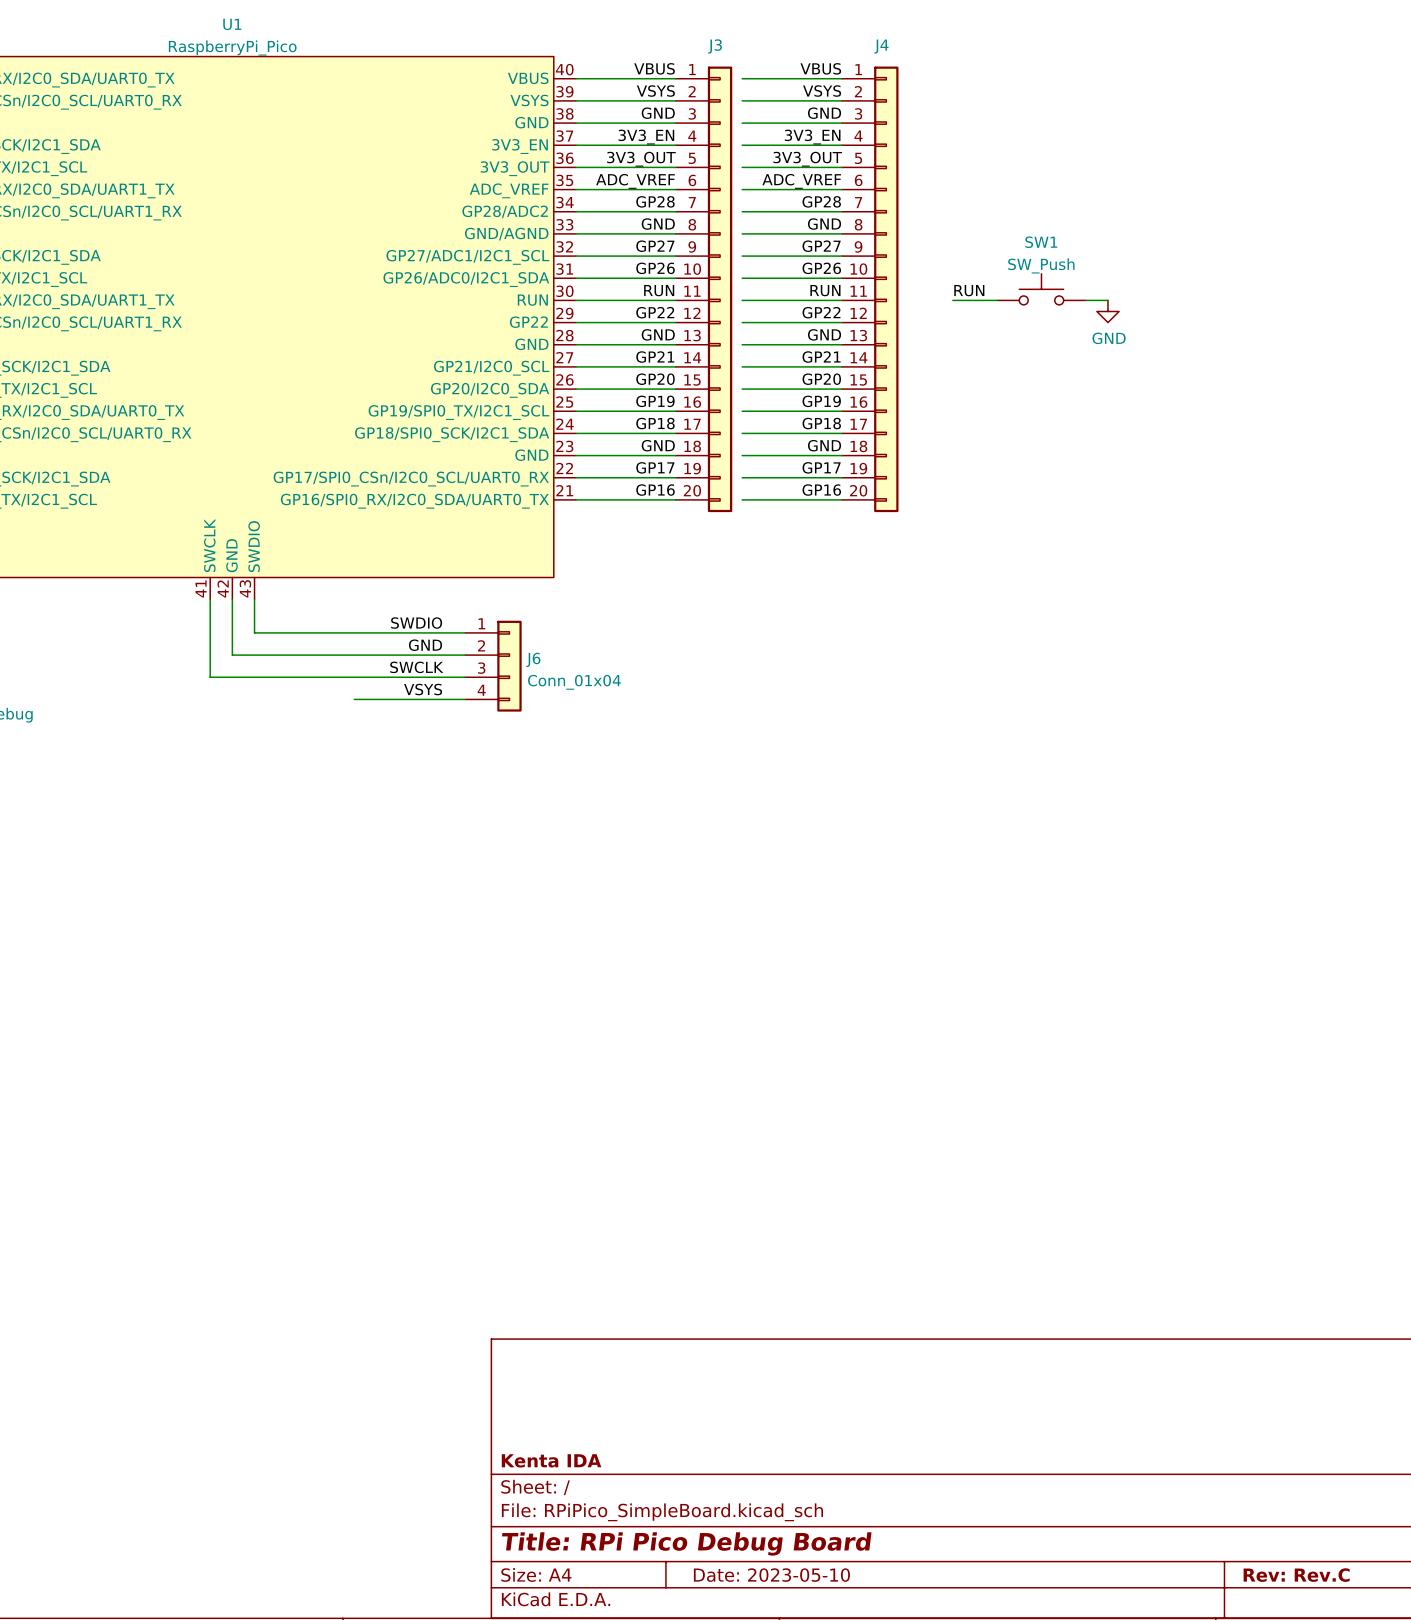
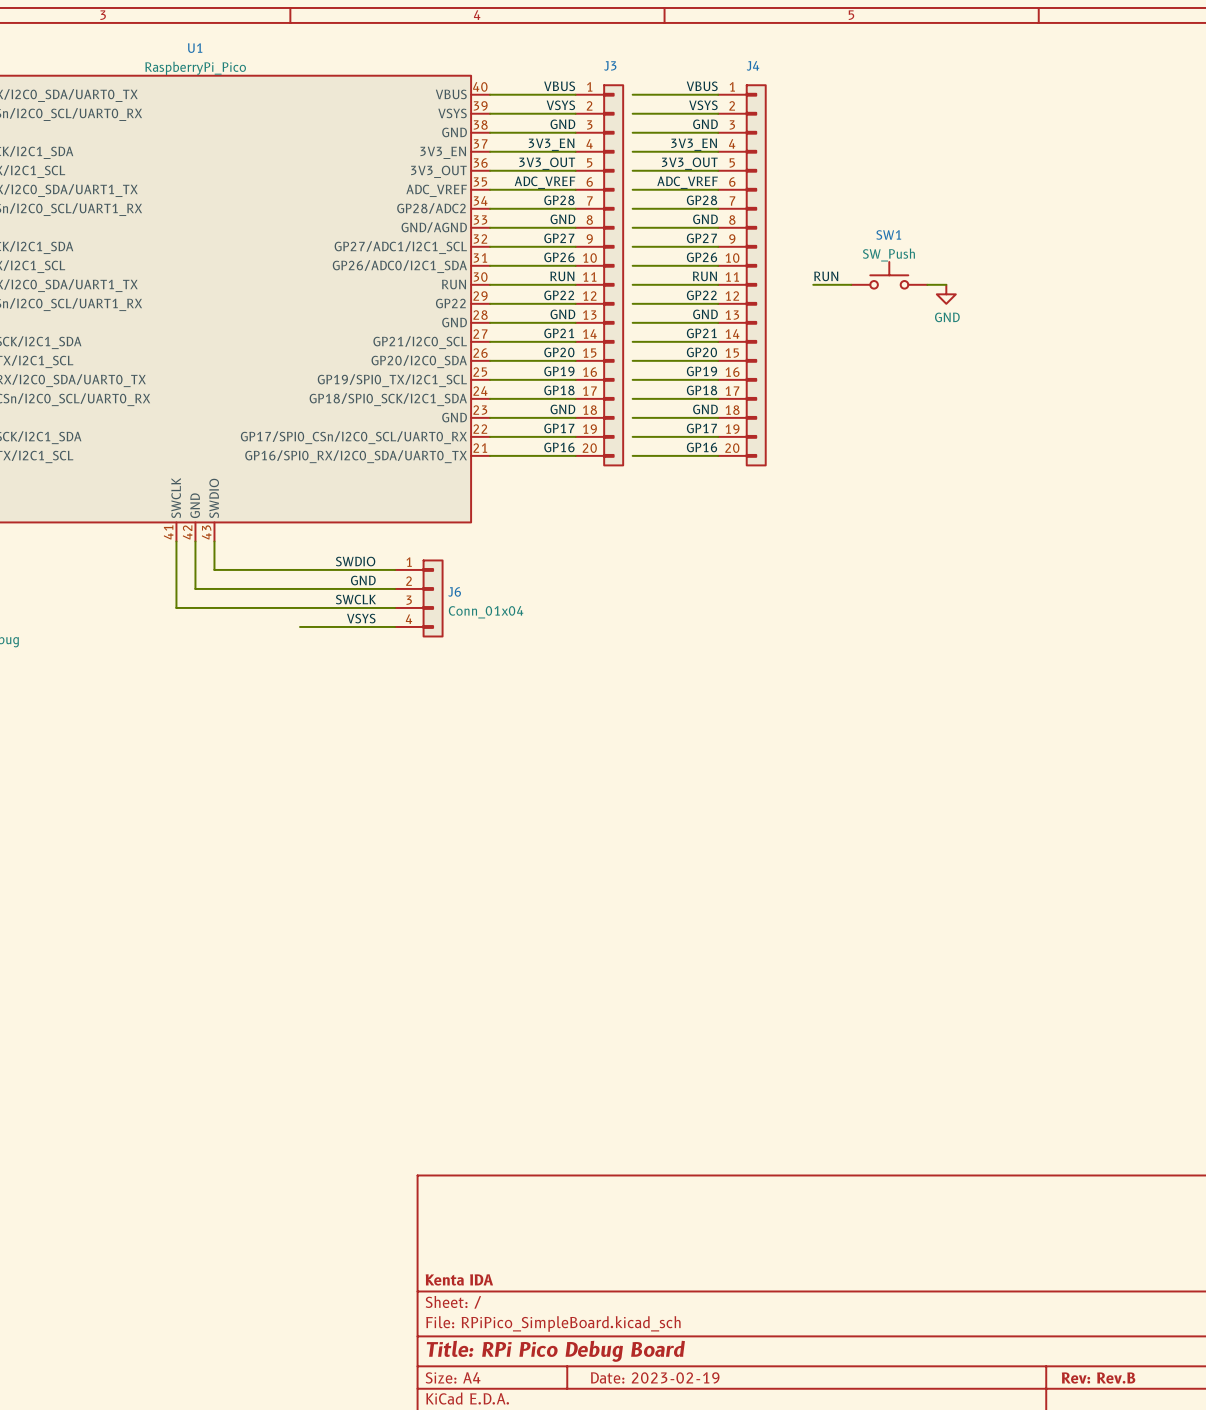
title block: Date: 2023-05-10 (771, 1575) -> Date: 2023-02-19 (655, 1377)
title block: Rev: Rev.C (1296, 1575) -> Rev: Rev.B (1098, 1378)

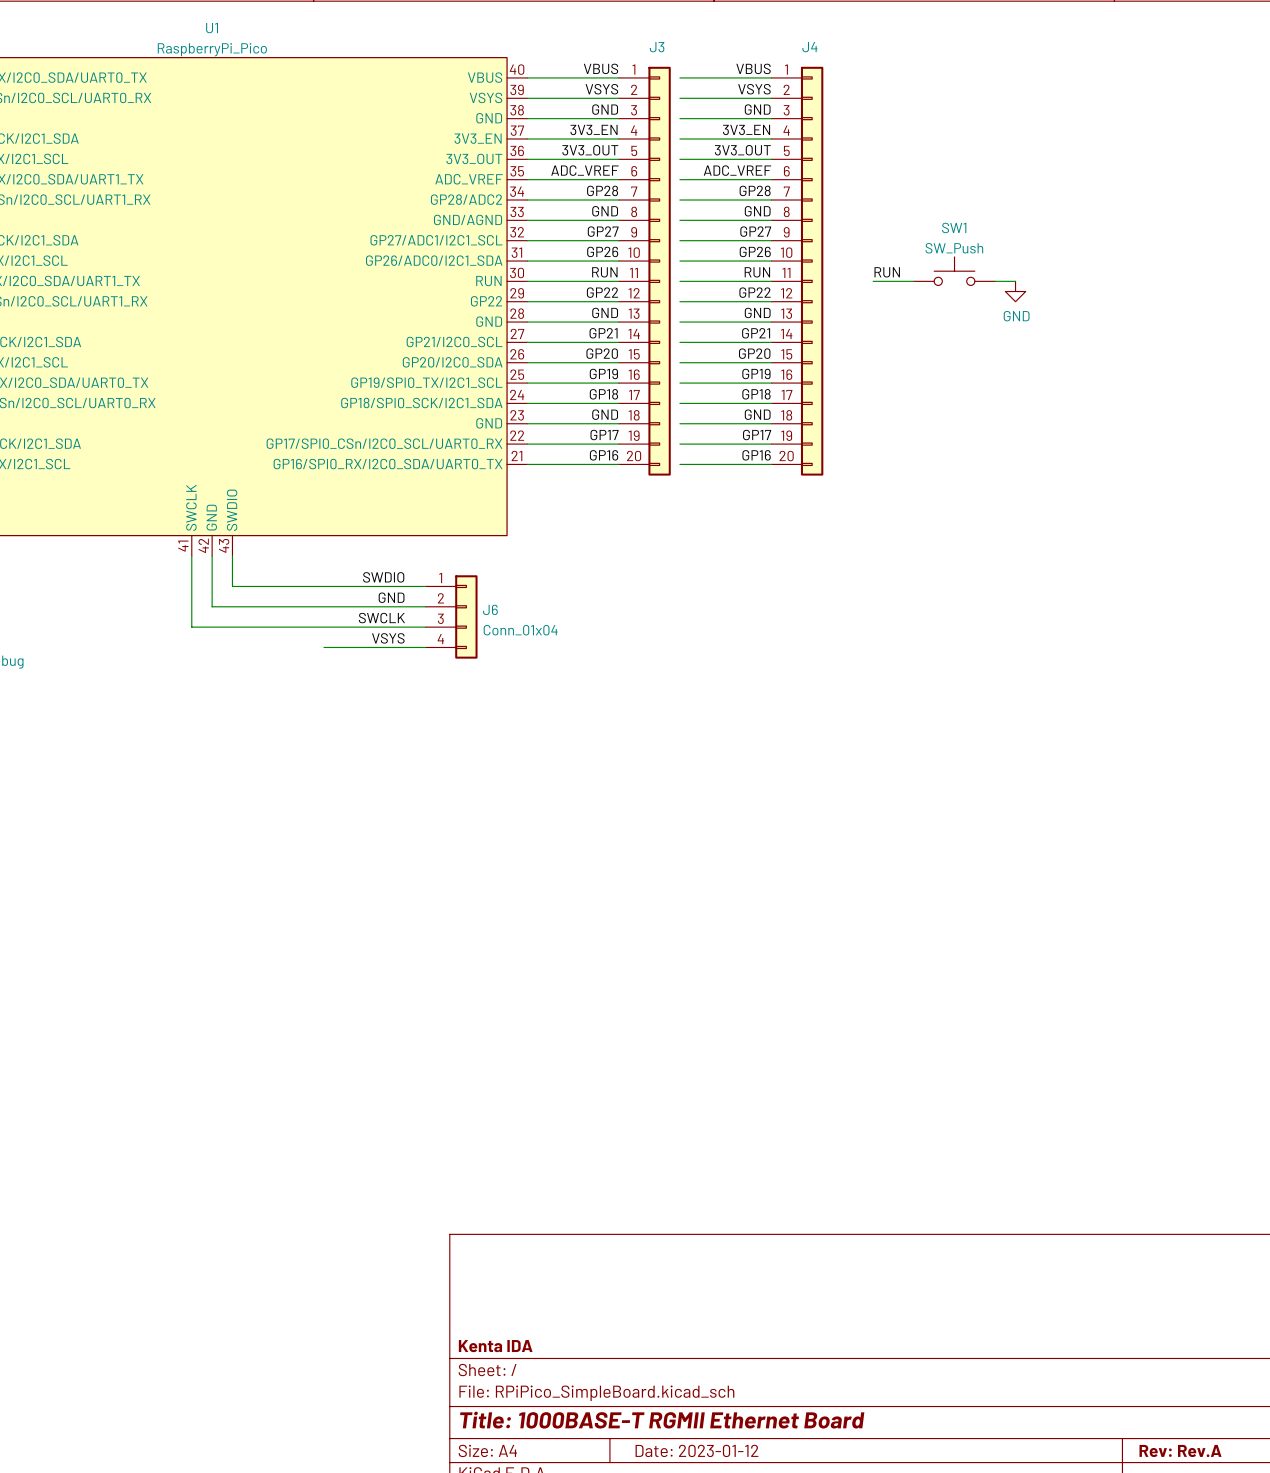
title block: Title: RPi Pico Debug Board (555, 1351) -> Title: 1000BASE-T RGMII Ethernet Board (662, 1420)
title block: Date: 2023-02-19 (655, 1377) -> Date: 2023-01-12 (696, 1450)
title block: Rev: Rev.B (1098, 1378) -> Rev: Rev.A (1180, 1450)

